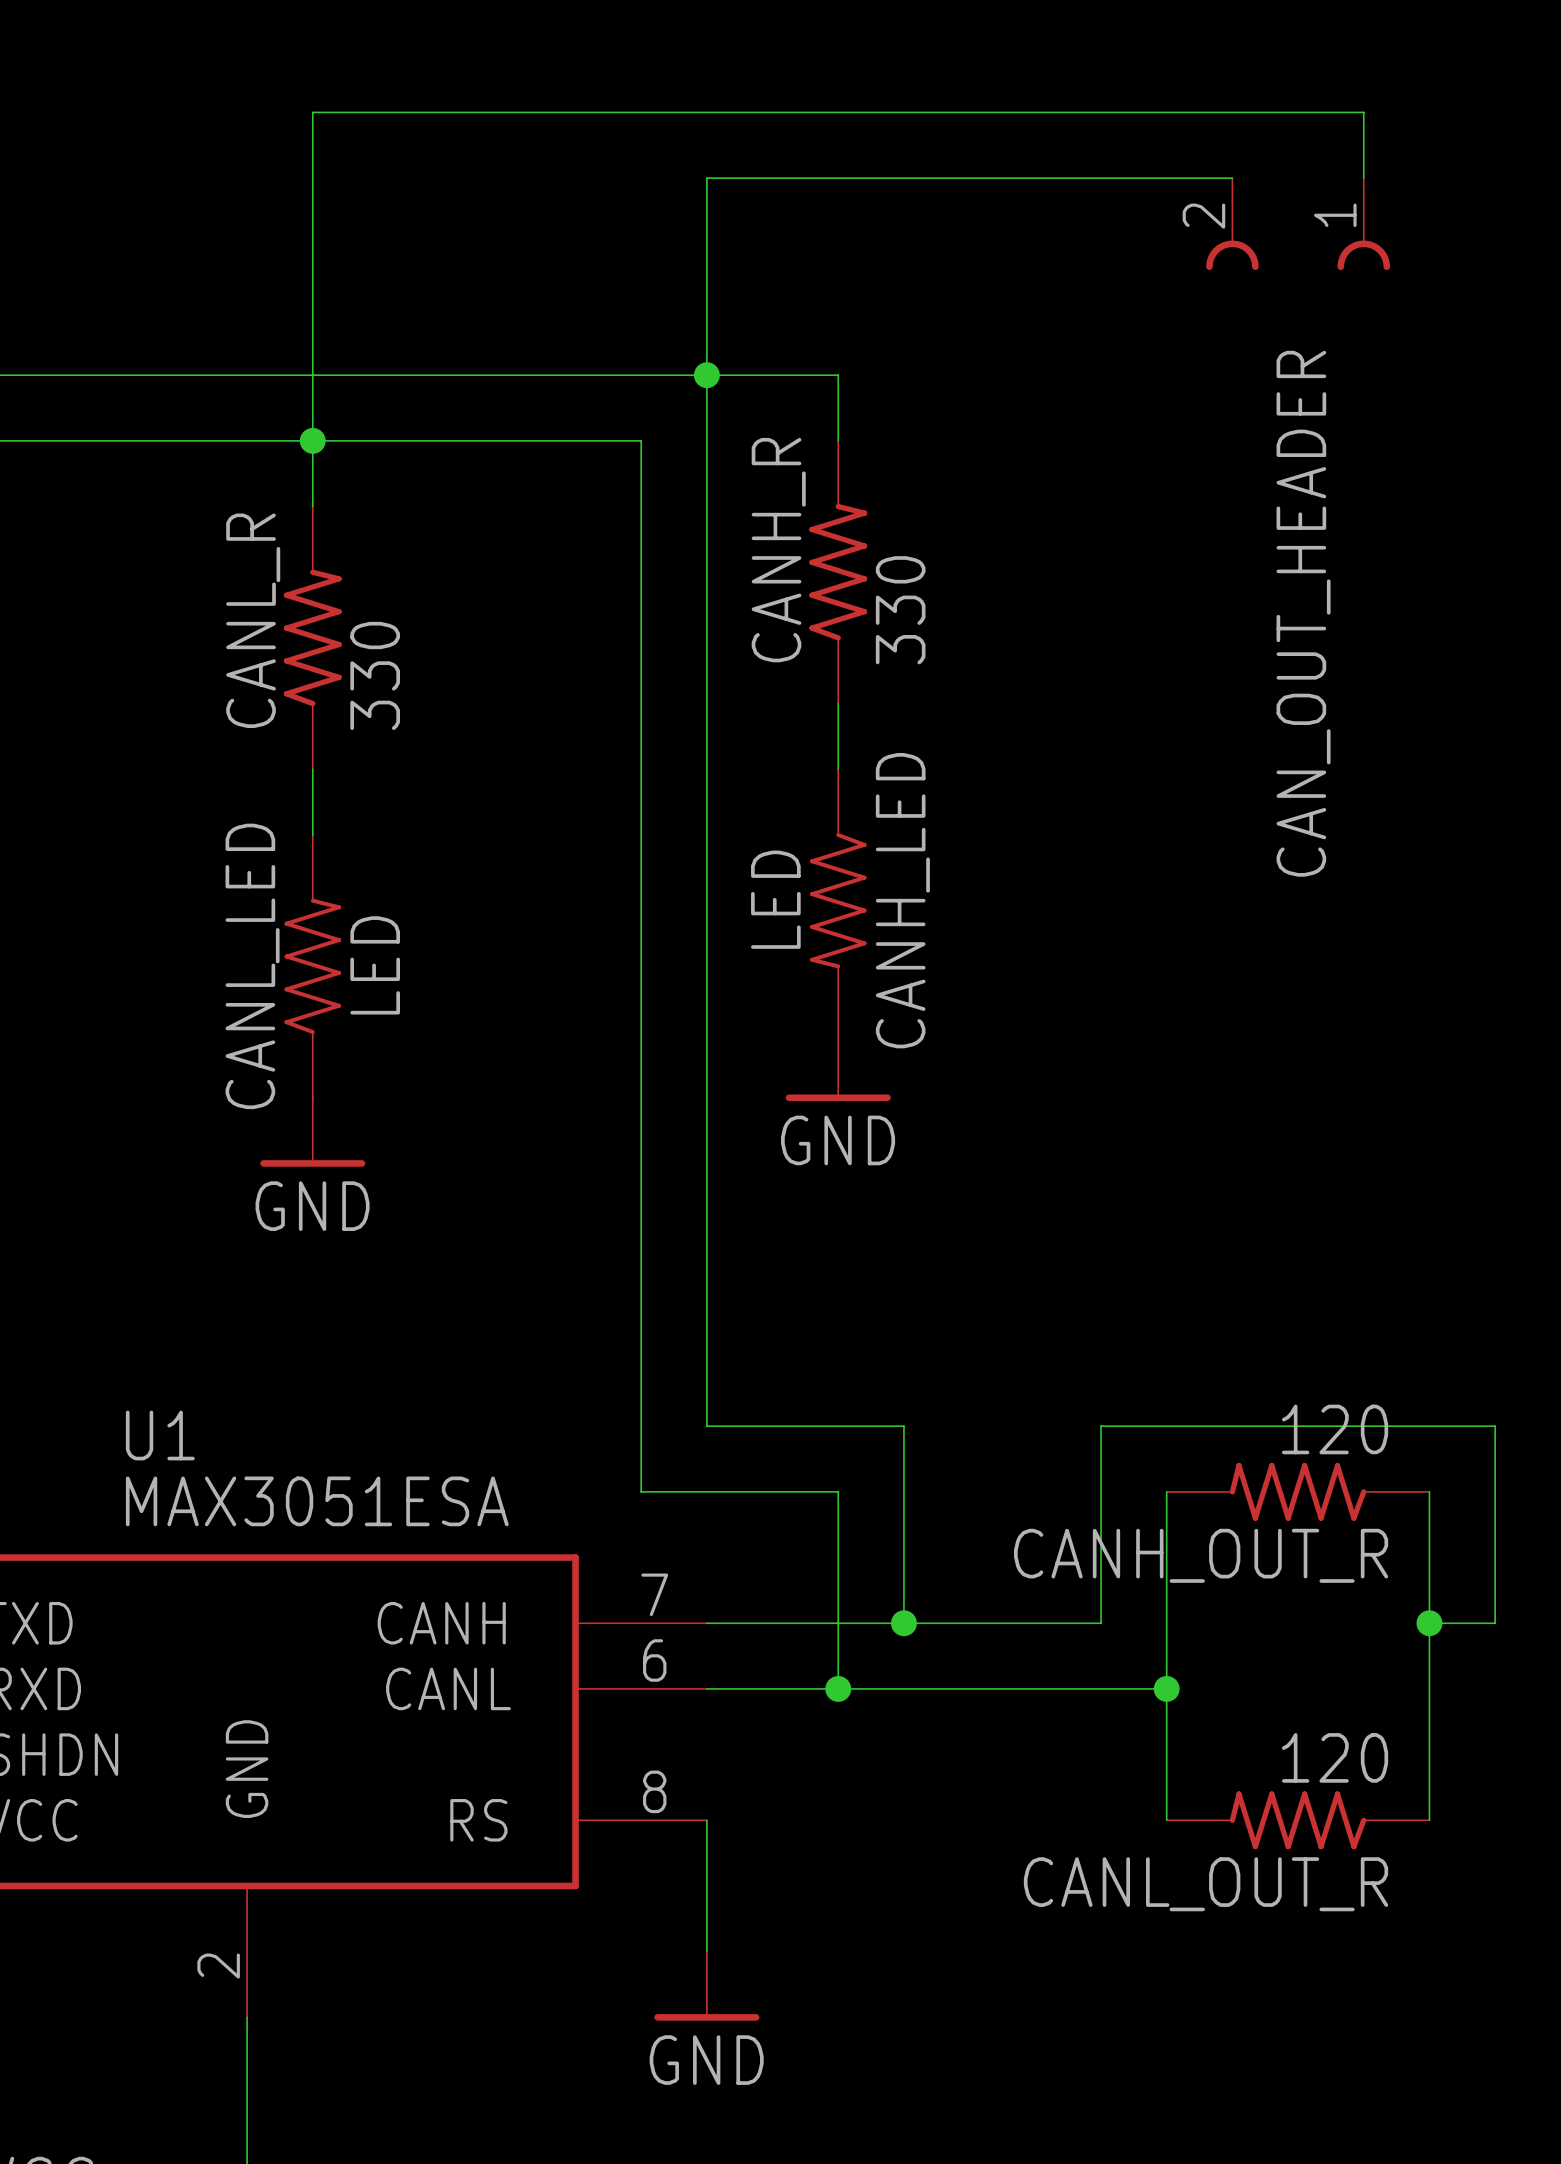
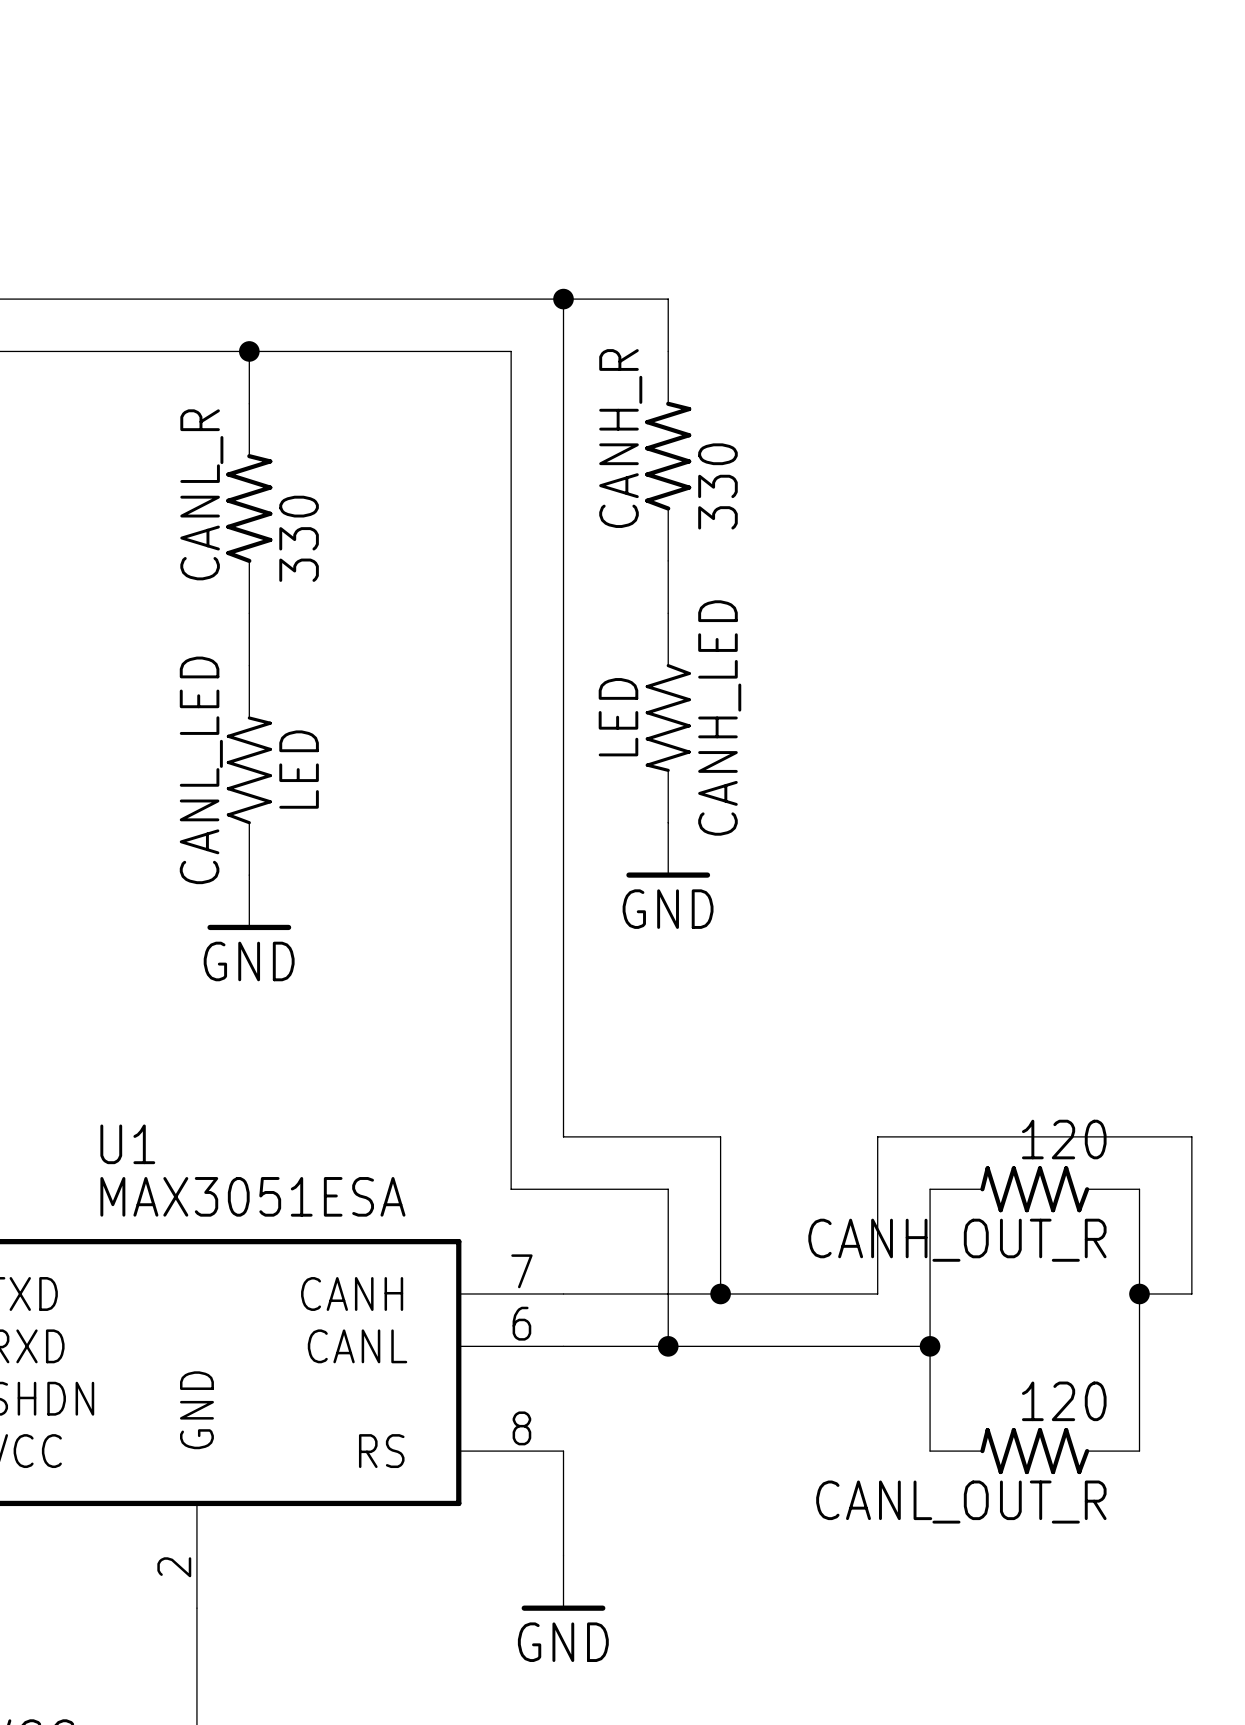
wire: (1232, 178) (706, 178) (706, 375) -> none
wire: (1363, 178) (1363, 112) (312, 112) (312, 440) -> none
CAN_OUT_HEADER: (1298, 224) -> none

